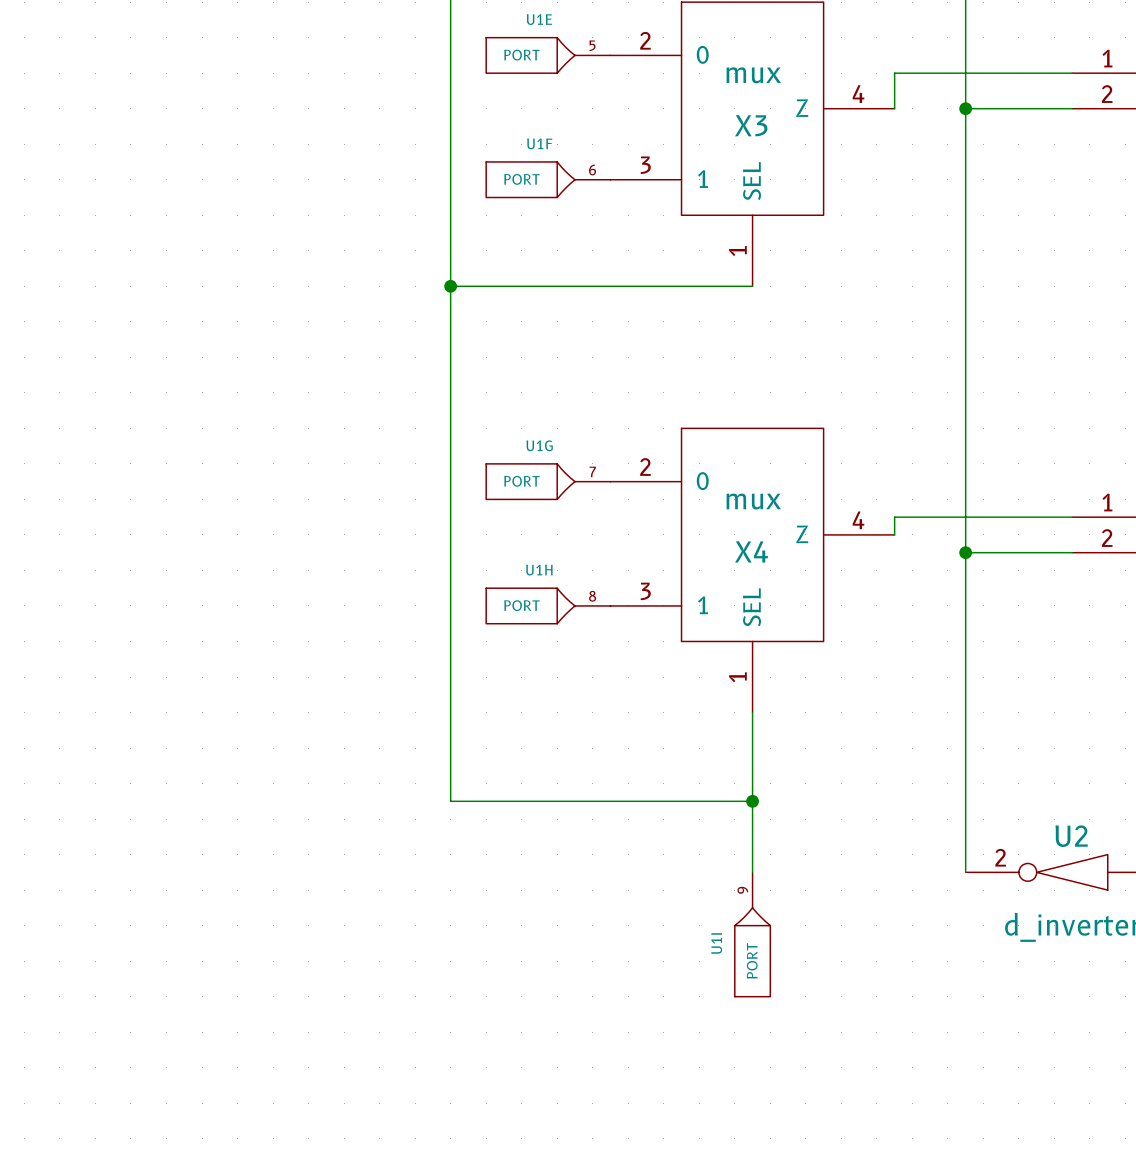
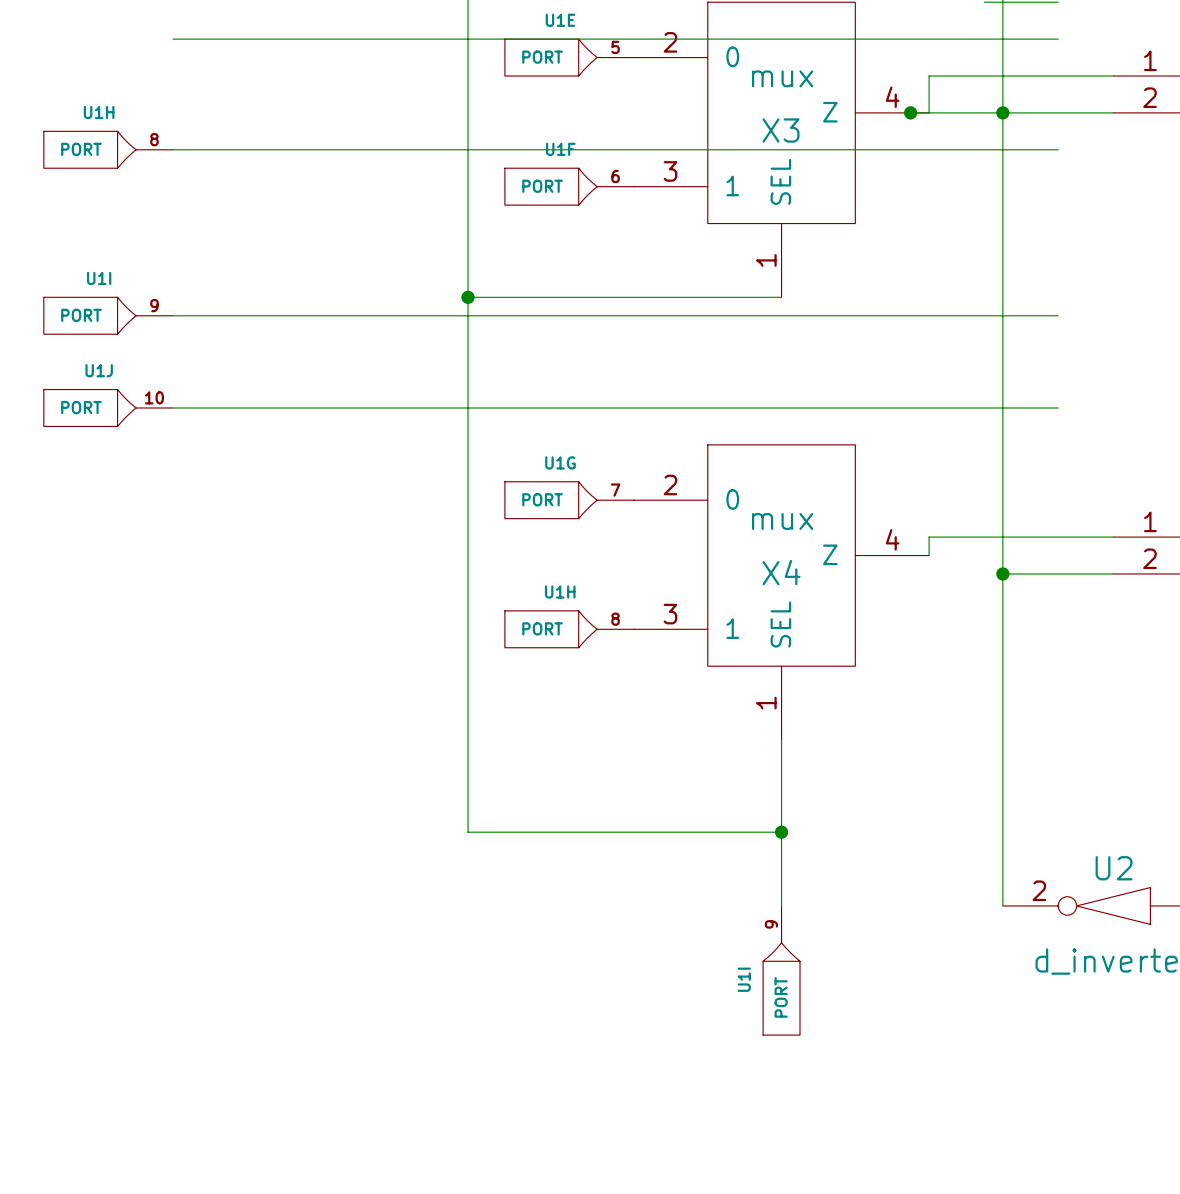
wire: none -> (984, 2) (1058, 2)
wire: none -> (172, 39) (1058, 39)
wire: none -> (910, 112) (1002, 112)
junction: none -> (910, 112)
U1H: none -> PORT (108, 149)
wire: none -> (172, 149) (1058, 149)
U1I: none -> PORT (108, 315)
wire: none -> (172, 315) (1058, 315)
U1J: none -> PORT (108, 407)
wire: none -> (172, 407) (1058, 407)

